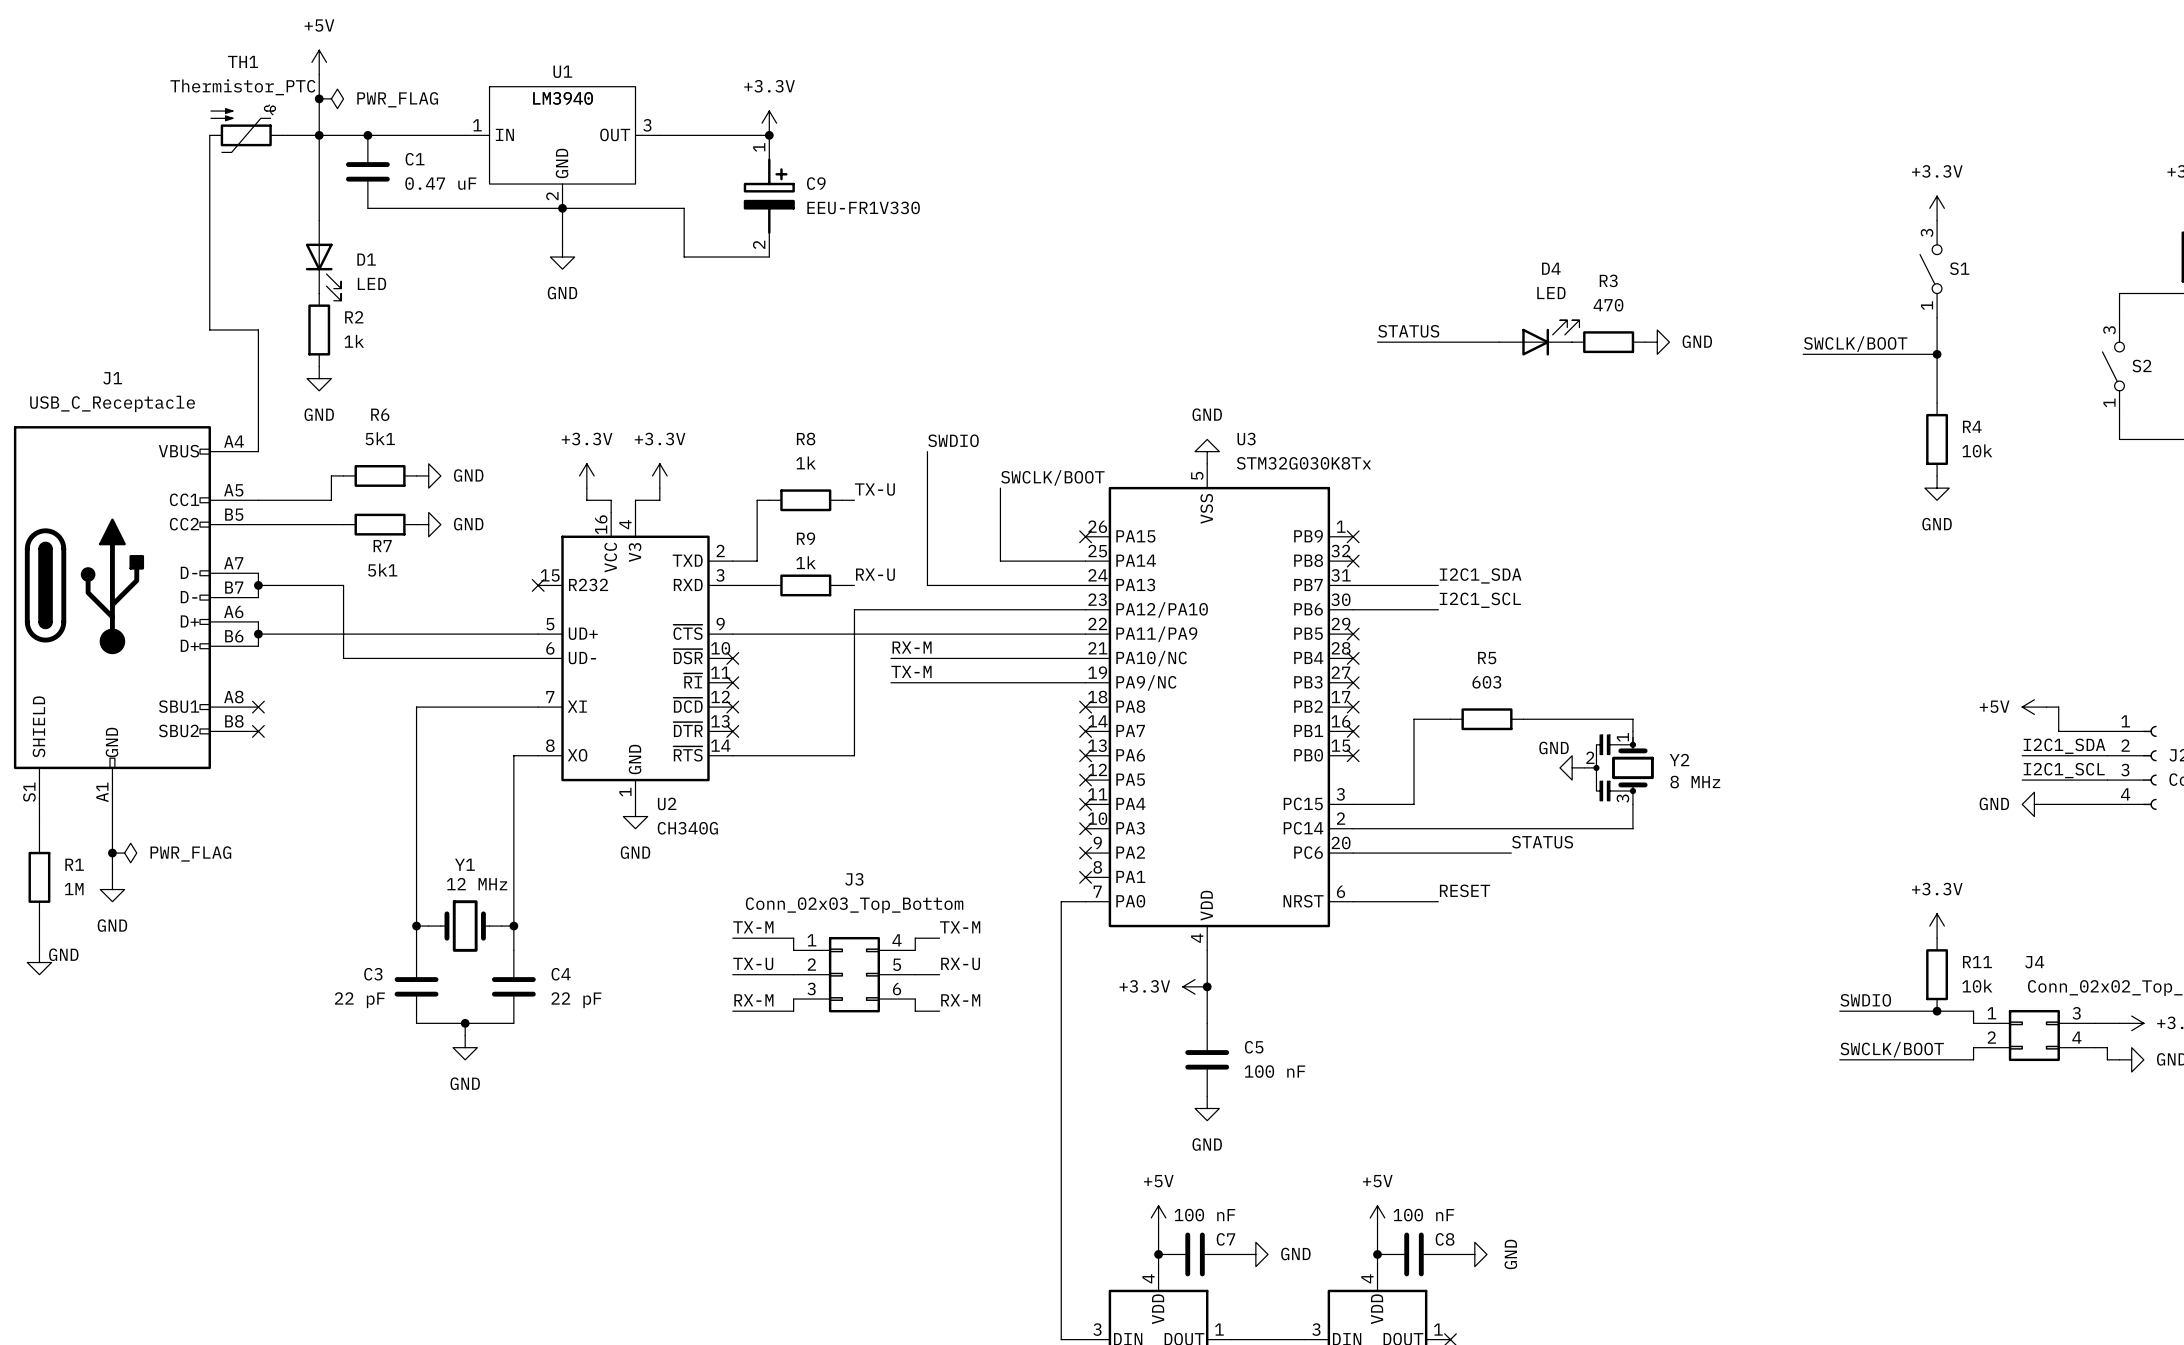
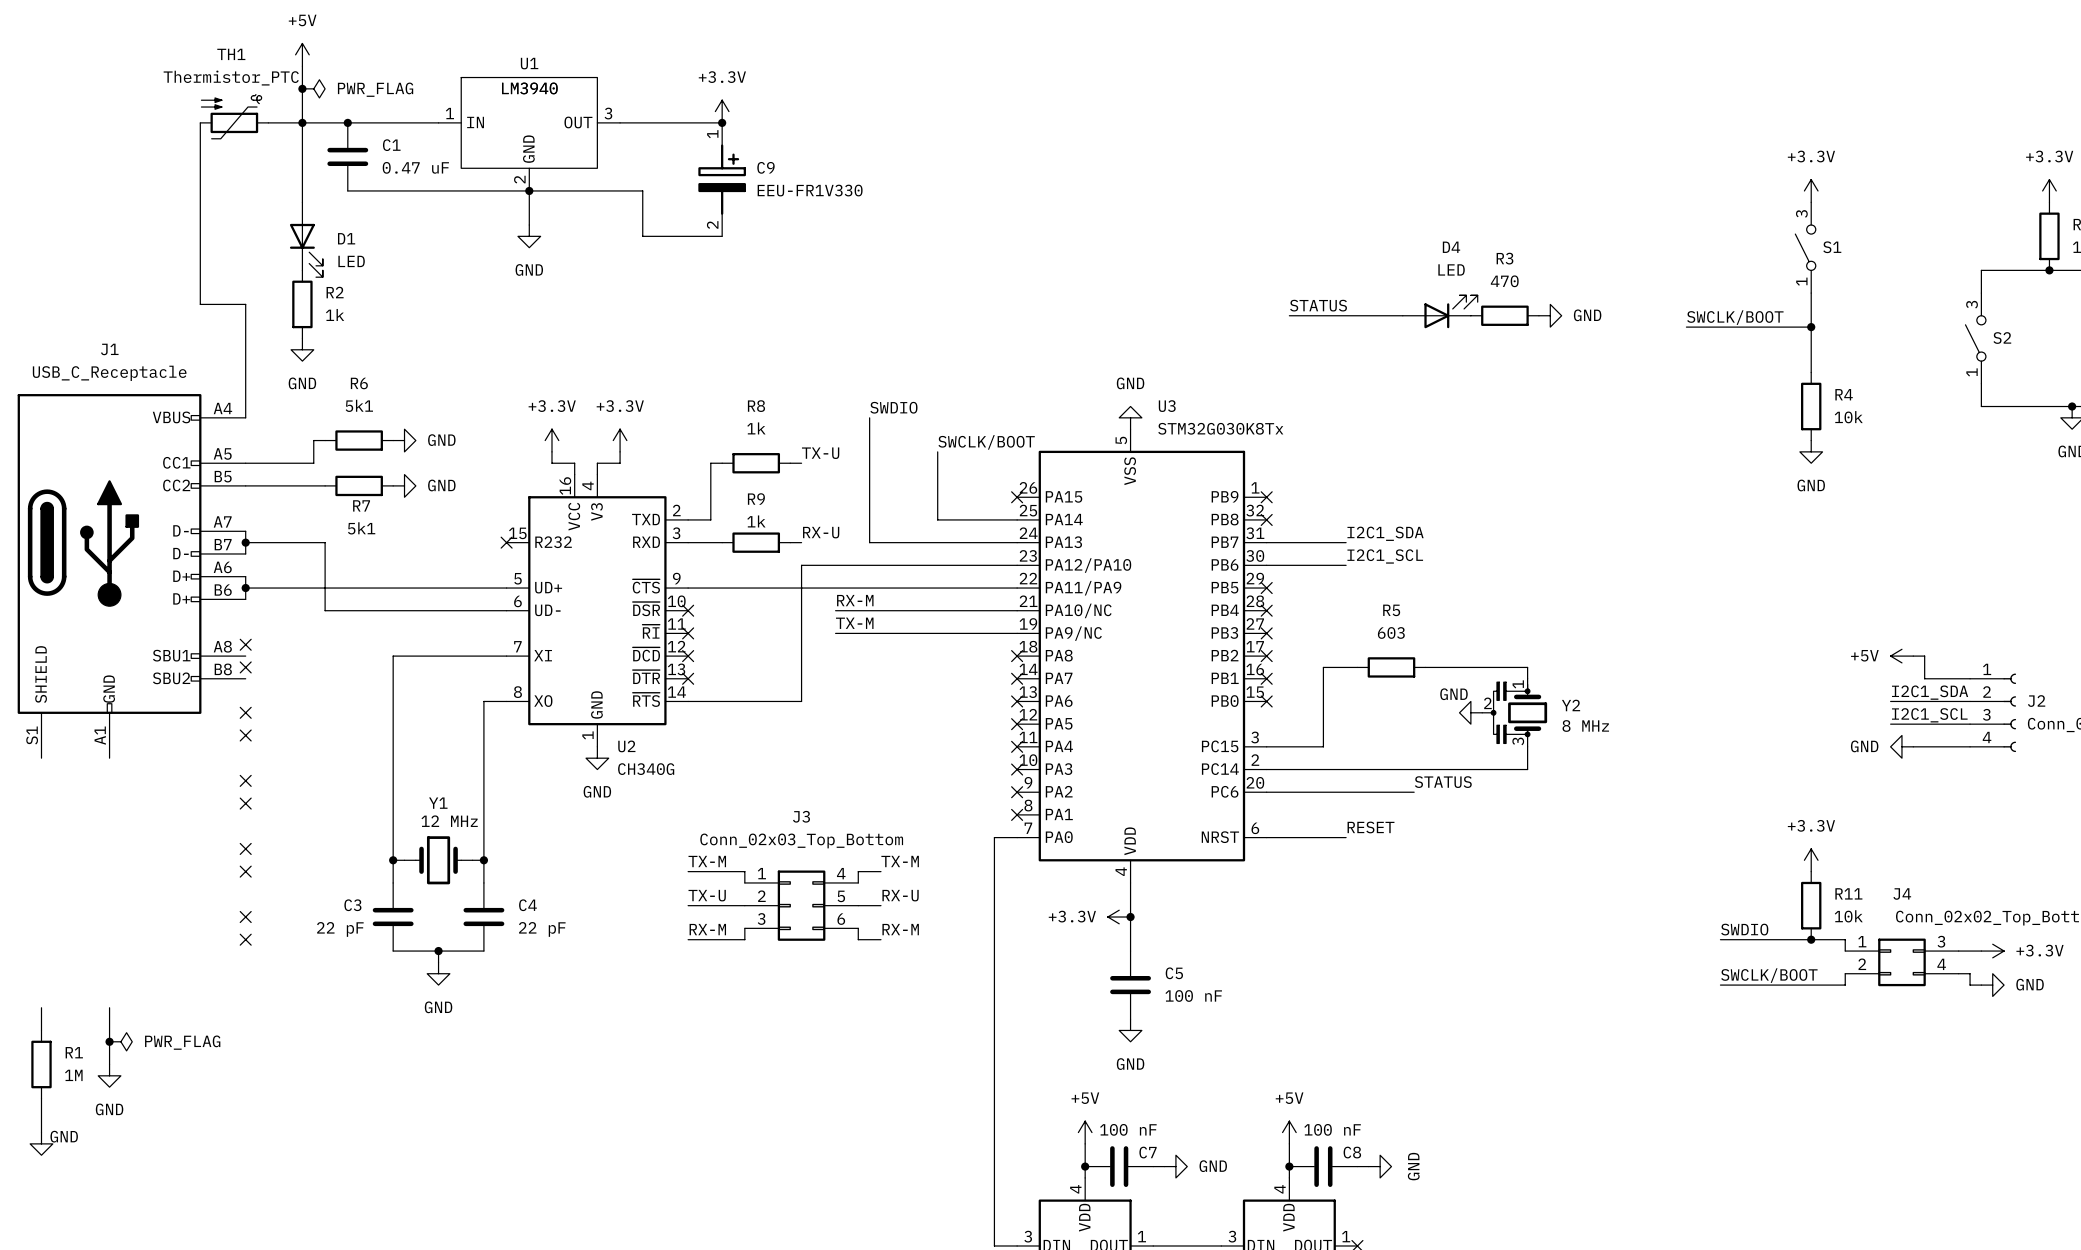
no-connect mark: none -> (245, 644)
no-connect mark: (258, 707) -> none
no-connect mark: none -> (245, 667)
no-connect mark: (258, 731) -> none
no-connect mark: none -> (245, 712)
no-connect mark: none -> (245, 735)
wire: (39, 816) (39, 840) -> none
wire: (112, 816) (112, 877) -> none
no-connect mark: none -> (245, 780)
junction: (112, 853) -> none
power symbol: PWR_FLAG (124, 853) -> none
no-connect mark: none -> (245, 803)
R1 position: (39, 877) -> (41, 1064)
power symbol: GND (112, 889) -> none
wire: (39, 913) (39, 950) -> none
no-connect mark: none -> (245, 848)
no-connect mark: none -> (245, 871)
power symbol: GND (39, 962) -> none
no-connect mark: none -> (245, 917)
no-connect mark: none -> (245, 939)
wire: none -> (41, 1007) (41, 1030)
wire: none -> (109, 1007) (109, 1064)
junction: none -> (109, 1041)
power symbol: none -> PWR_FLAG (120, 1041)
power symbol: none -> GND (109, 1075)
wire: none -> (41, 1098) (41, 1132)
power symbol: none -> GND (41, 1143)

